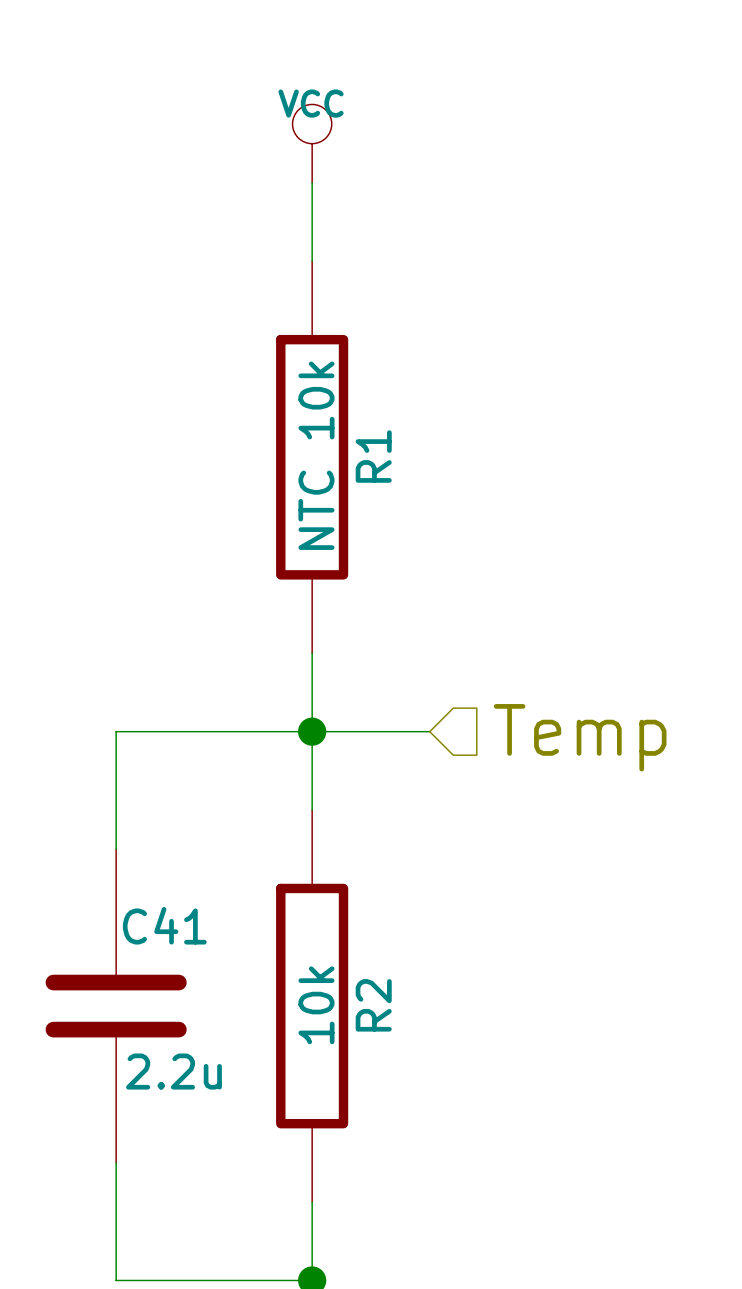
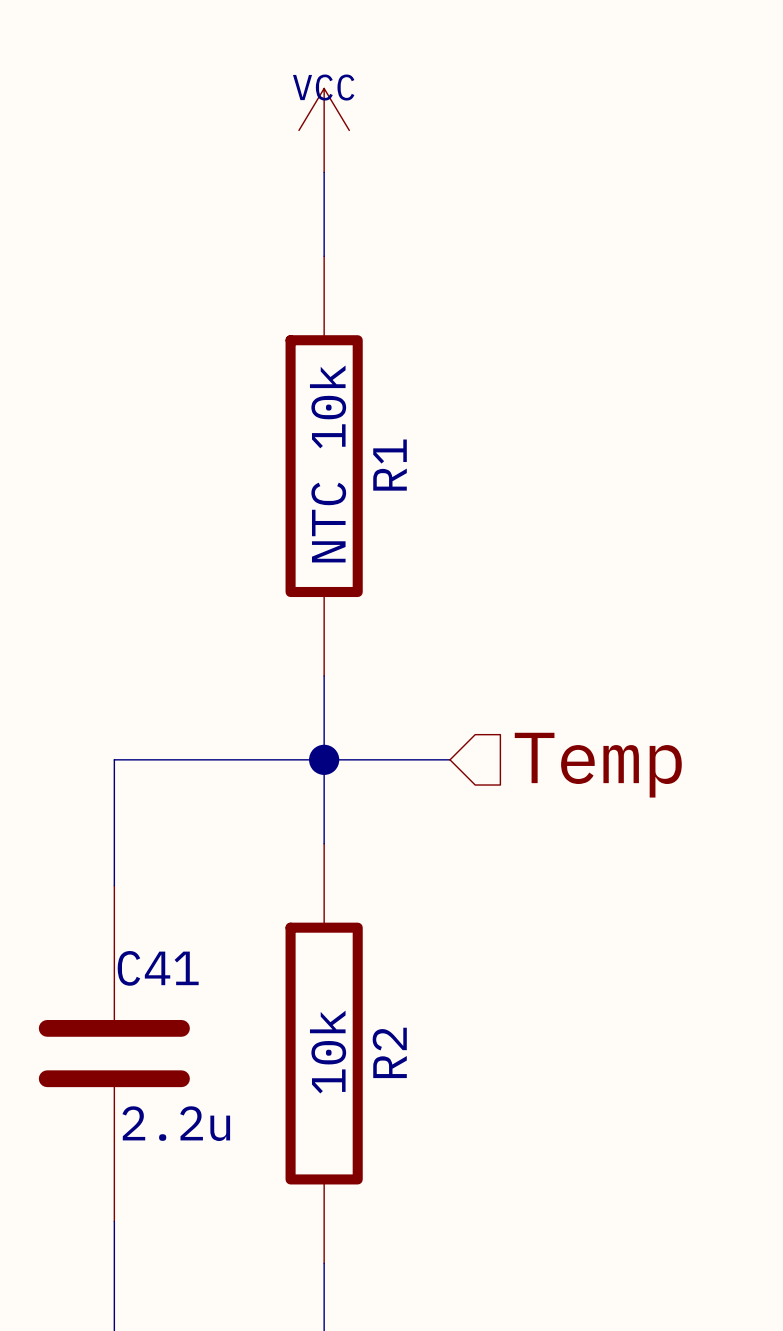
power symbol shape: [292, 104, 332, 183] -> [298, 88, 350, 173]

